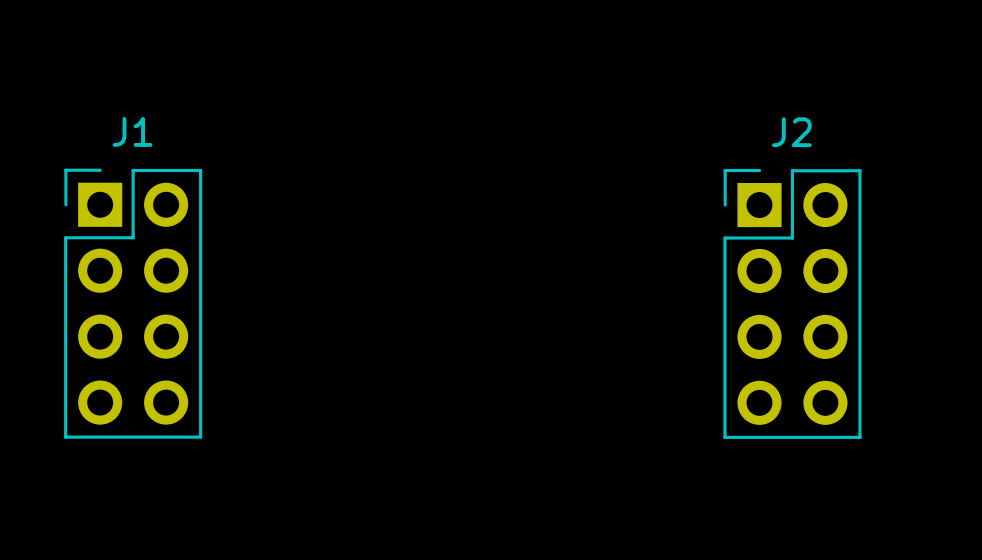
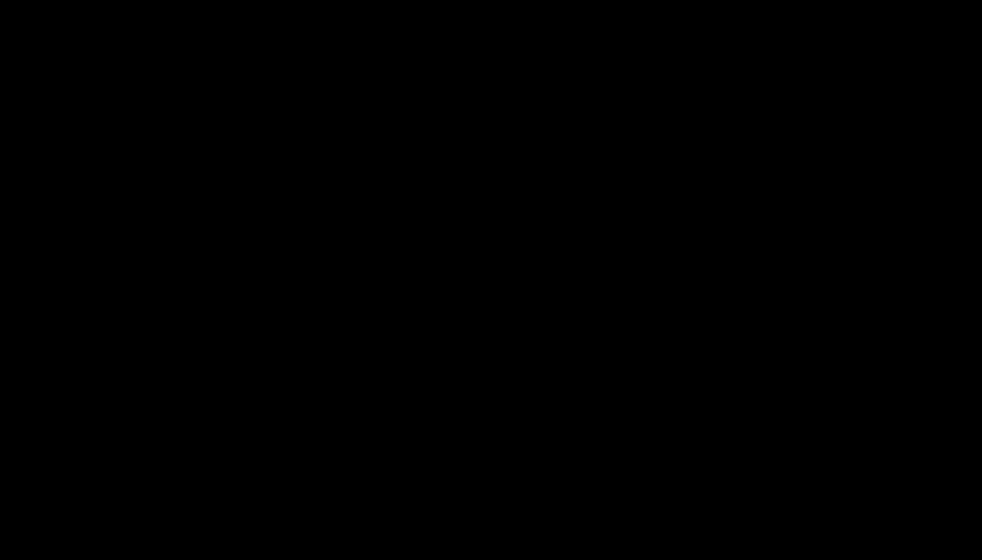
J1: (133, 303) -> none
J2: (792, 303) -> none

